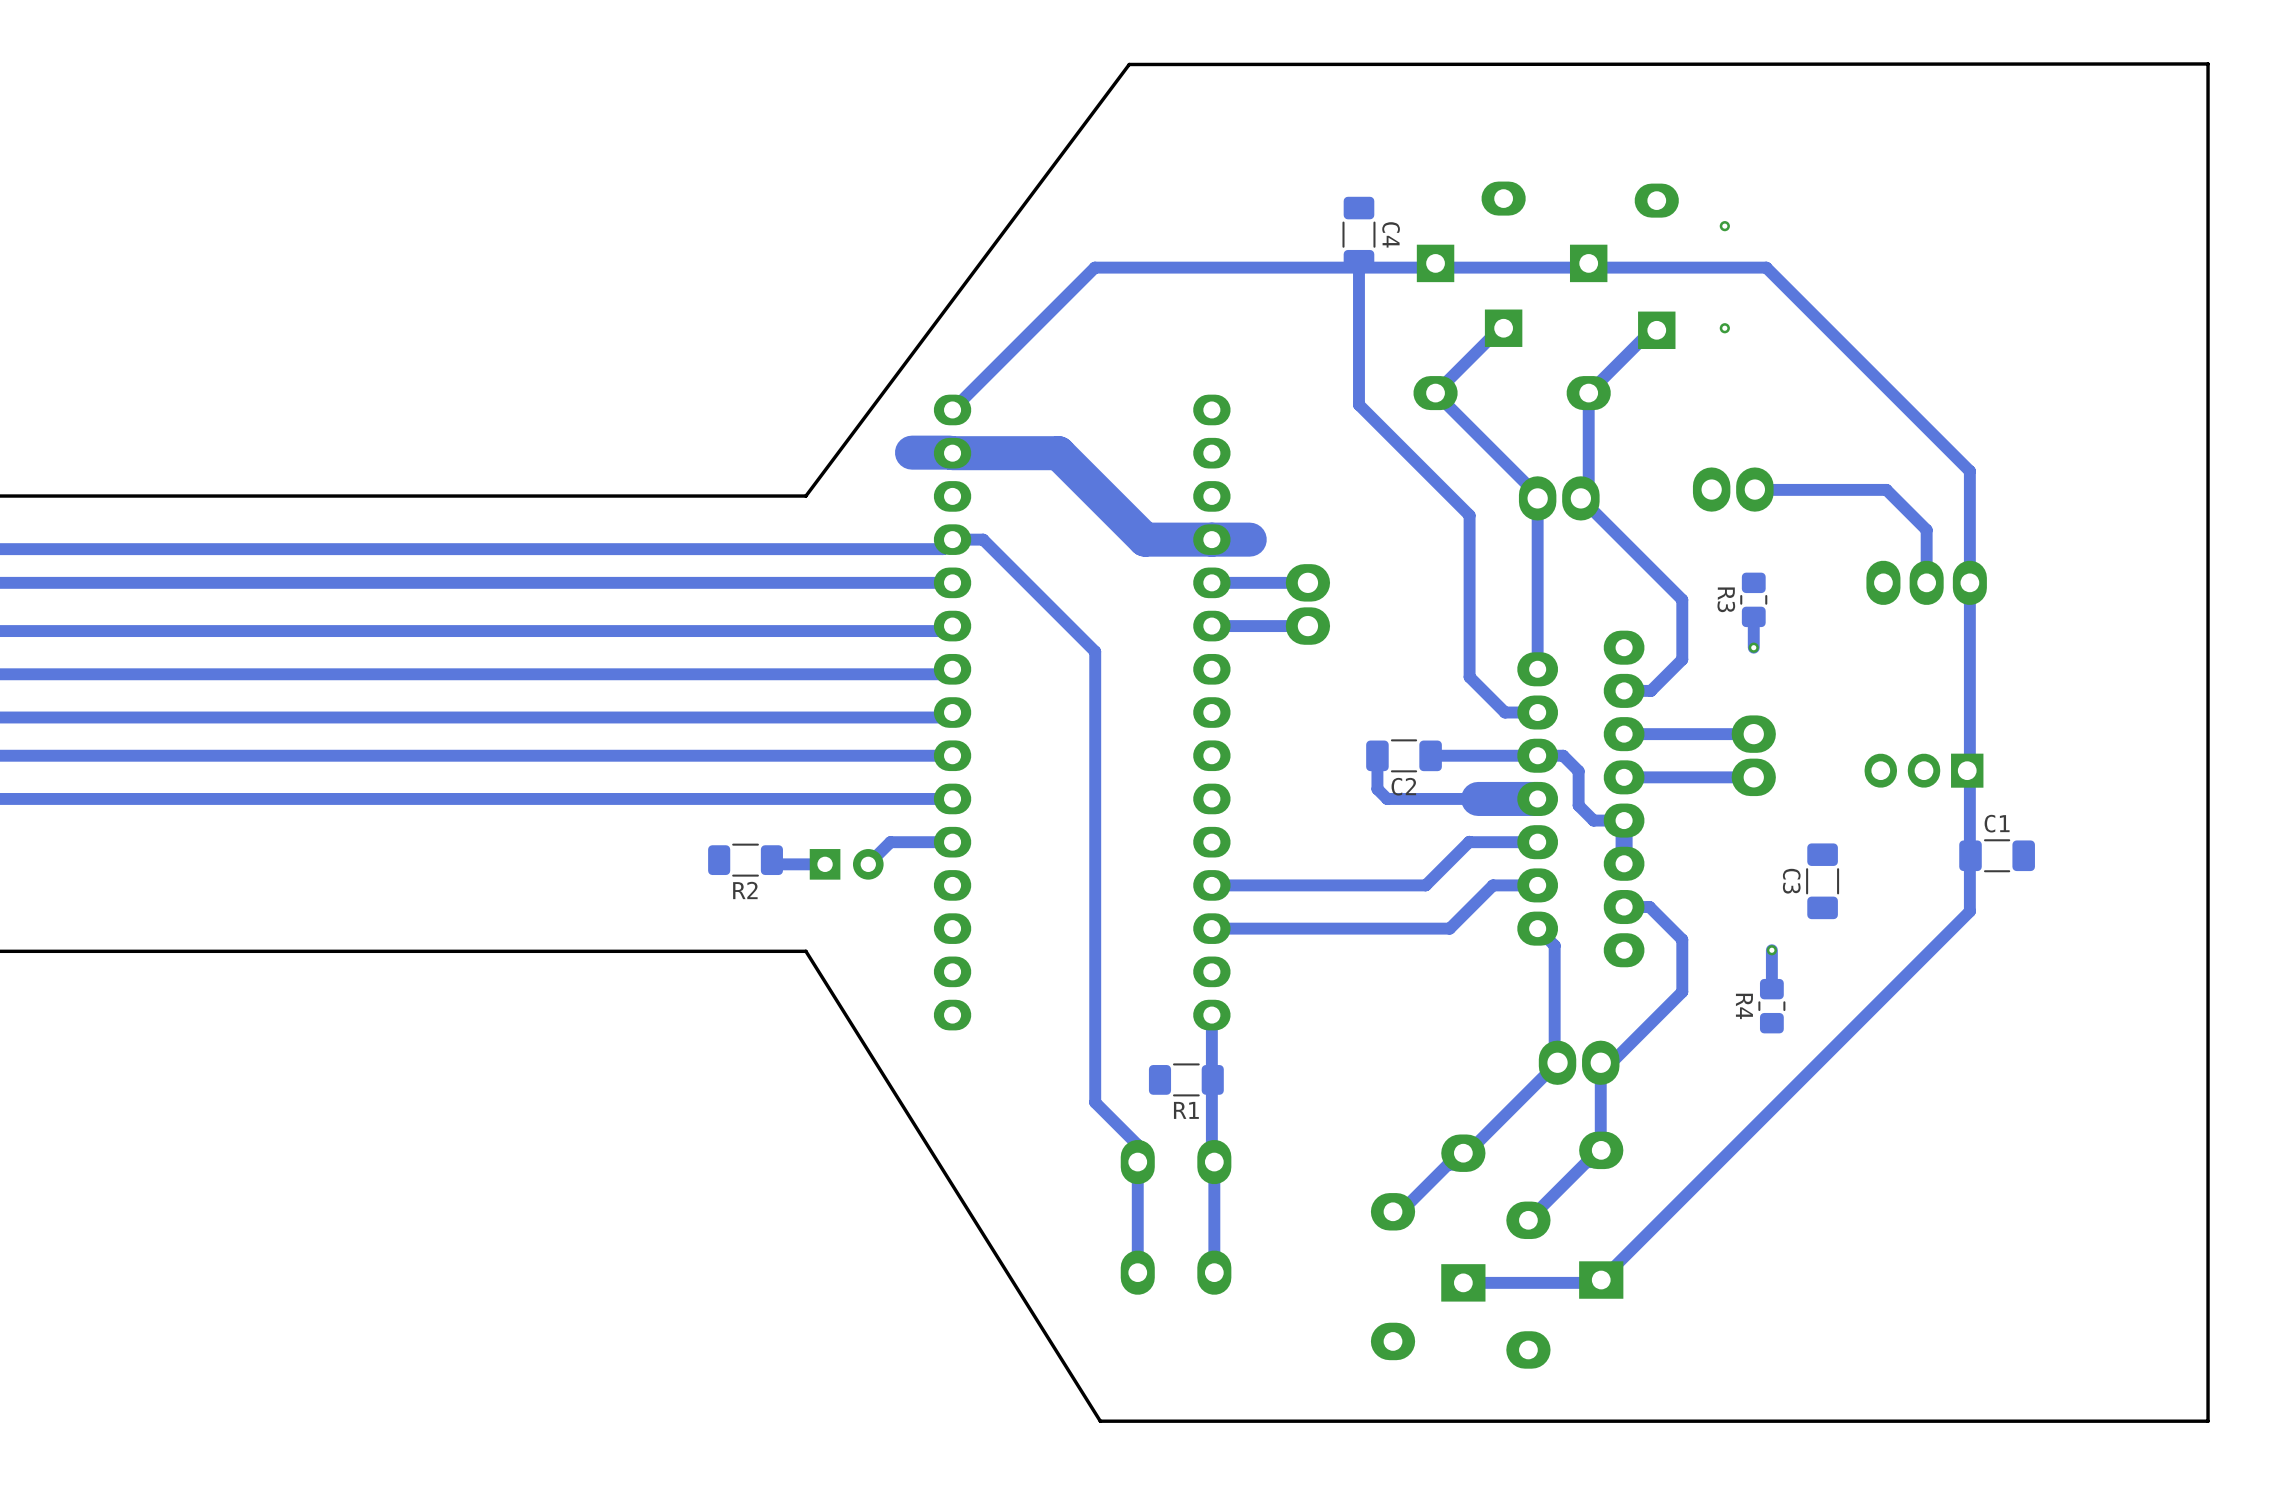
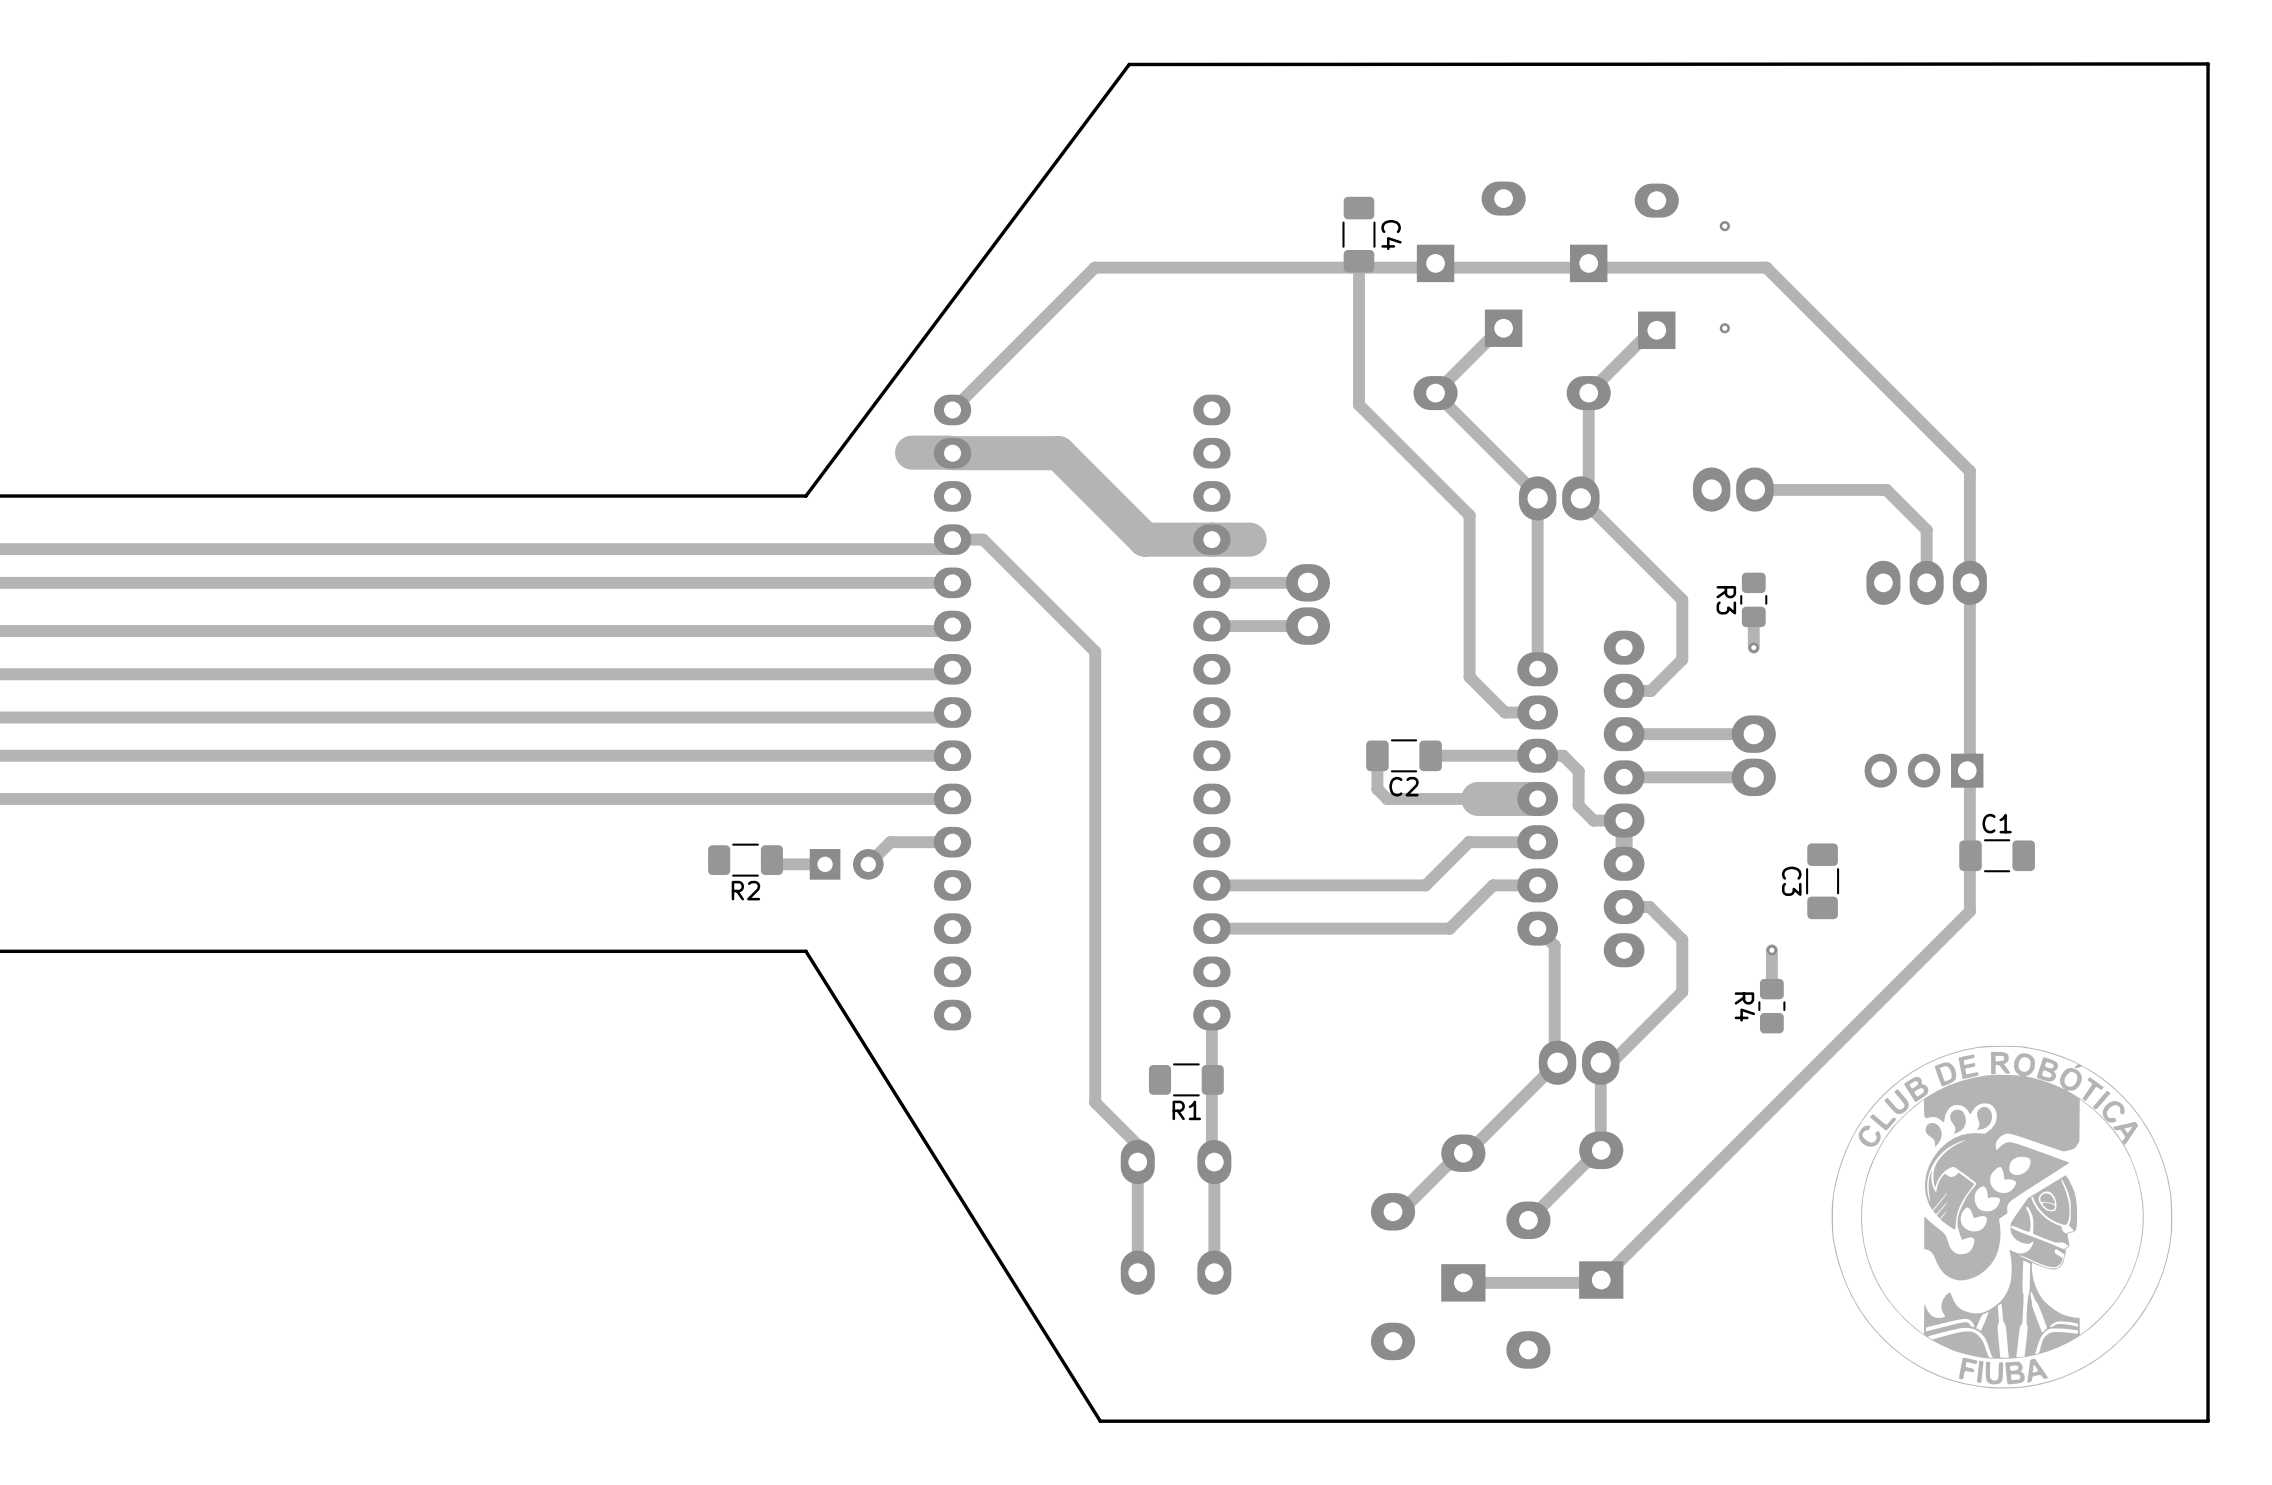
drawing: none -> [1831, 1045, 2173, 1389]

